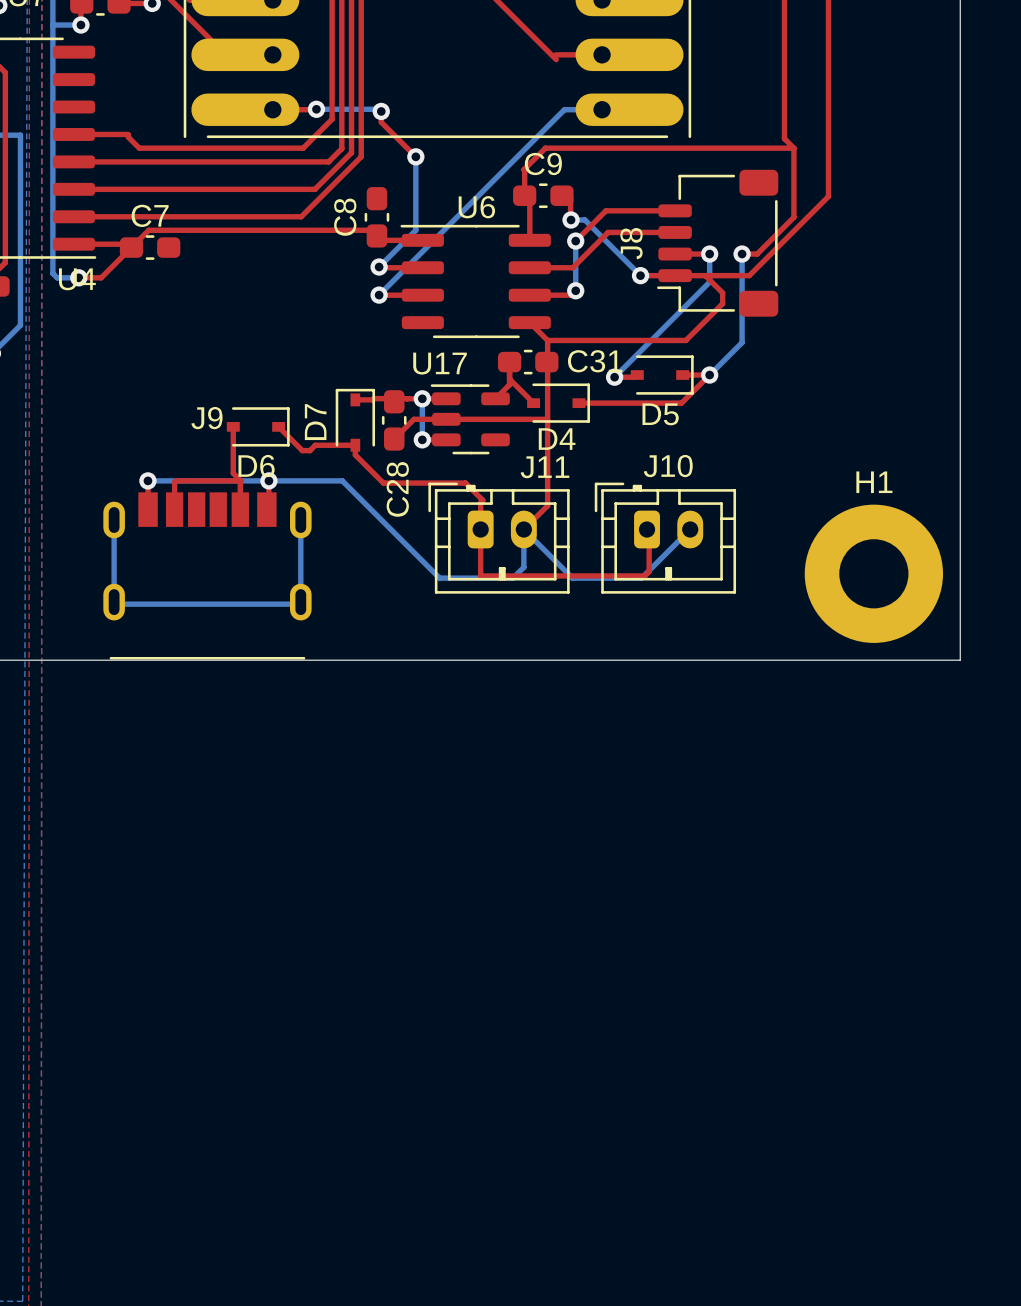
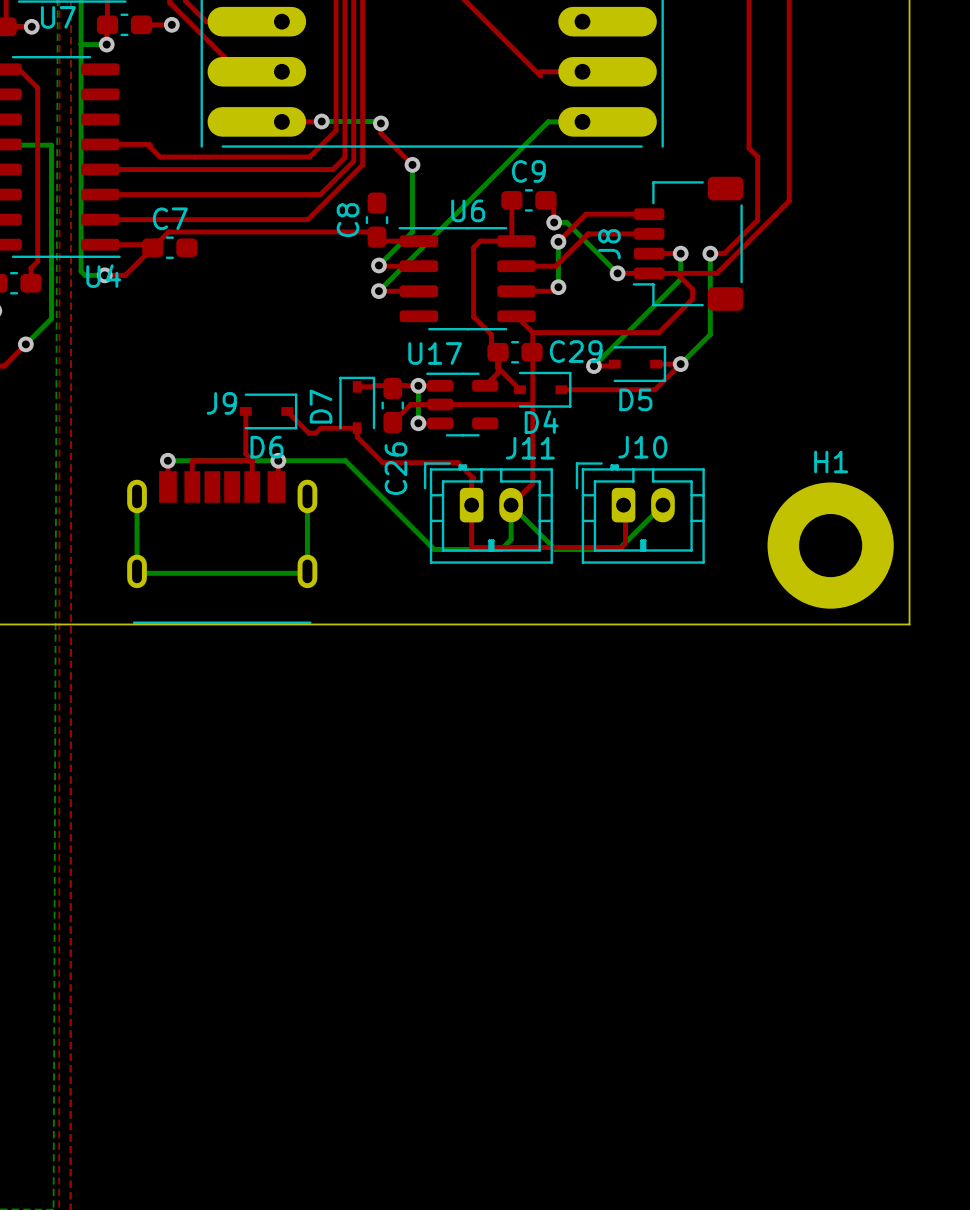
top track: (793, 148) (545, 148) (523, 169) (524, 195) (529, 200) (529, 240) -> none
top track: none -> (511, 200) (511, 236) (516, 241) (480, 241) (473, 247) (473, 316) (491, 334) (491, 345)
C31 name: C31 (595, 361) -> C29 (576, 351)
C28 name: C28 (397, 489) -> C26 (395, 468)

